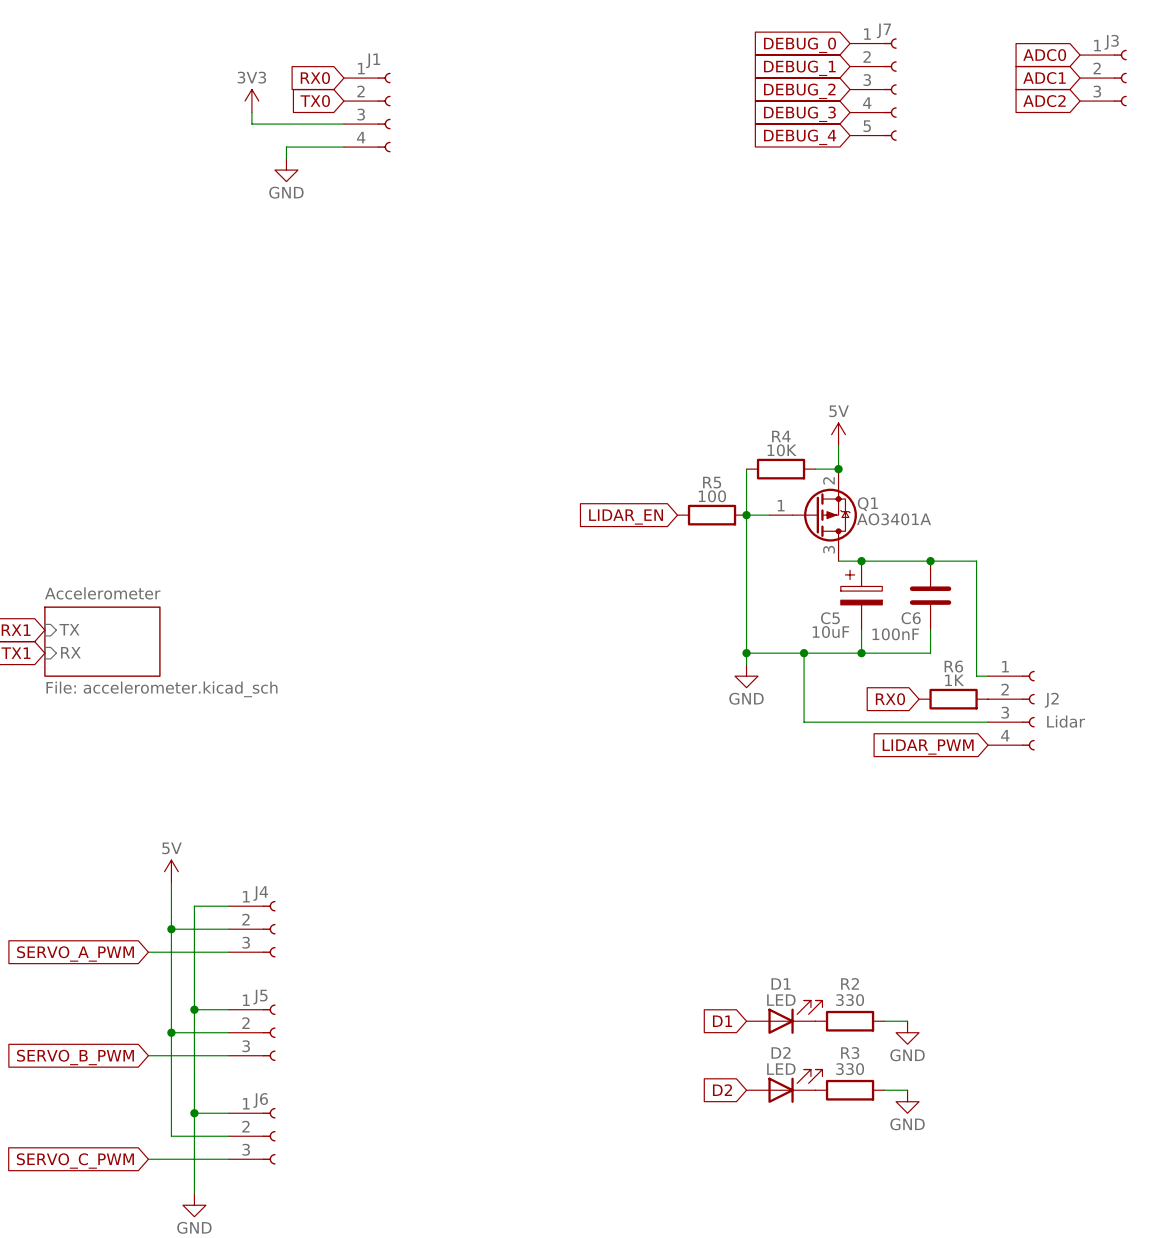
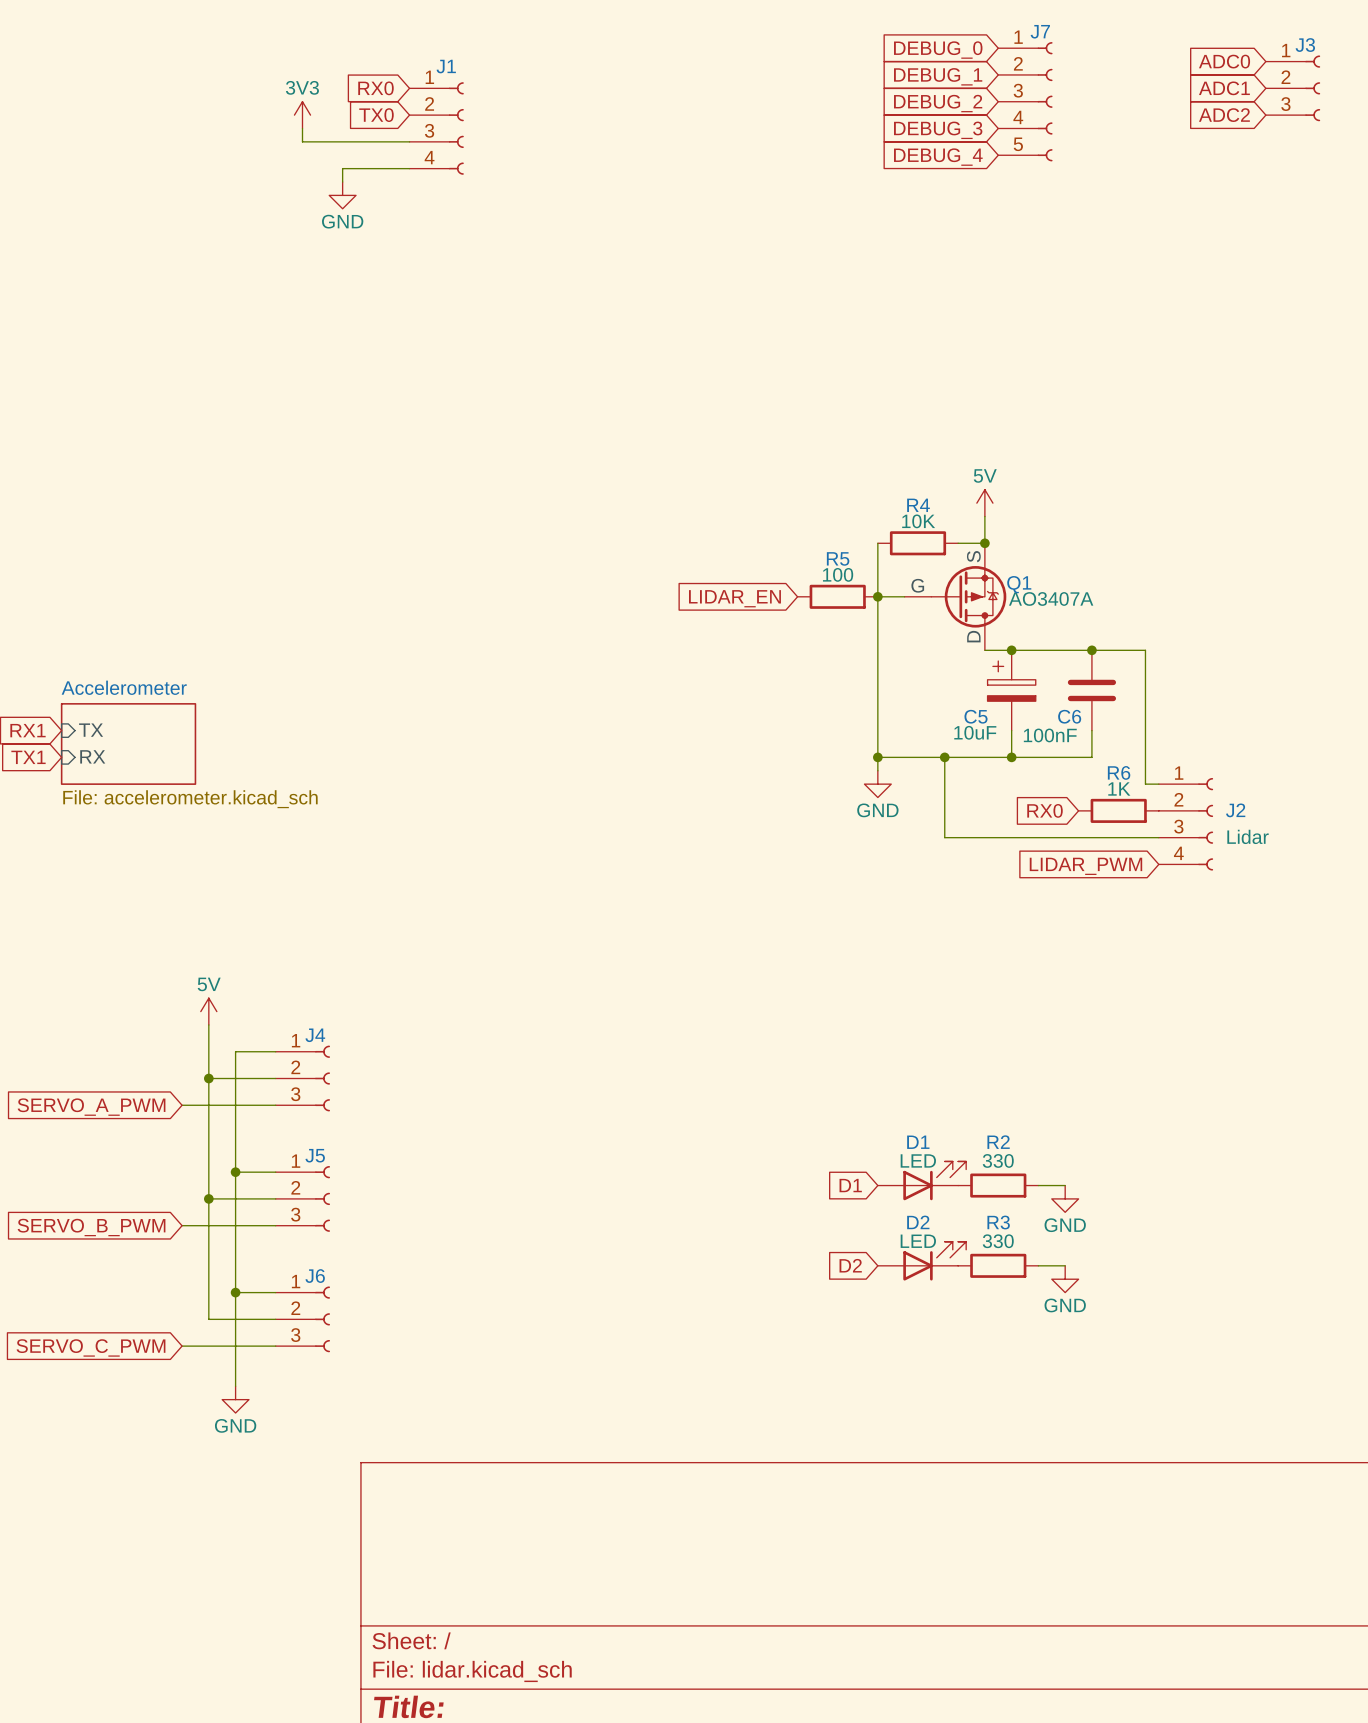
Q1 pin number: 2 (828, 480) -> none
Q1 pin name: none -> S (973, 556)
Q1 pin name: none -> G (917, 585)
Q1 pin number: 1 (781, 505) -> none
Q1 value: AO3401A (894, 519) -> AO3407A (1051, 598)
Q1 pin name: none -> D (973, 636)
Q1 pin number: 3 (829, 549) -> none

